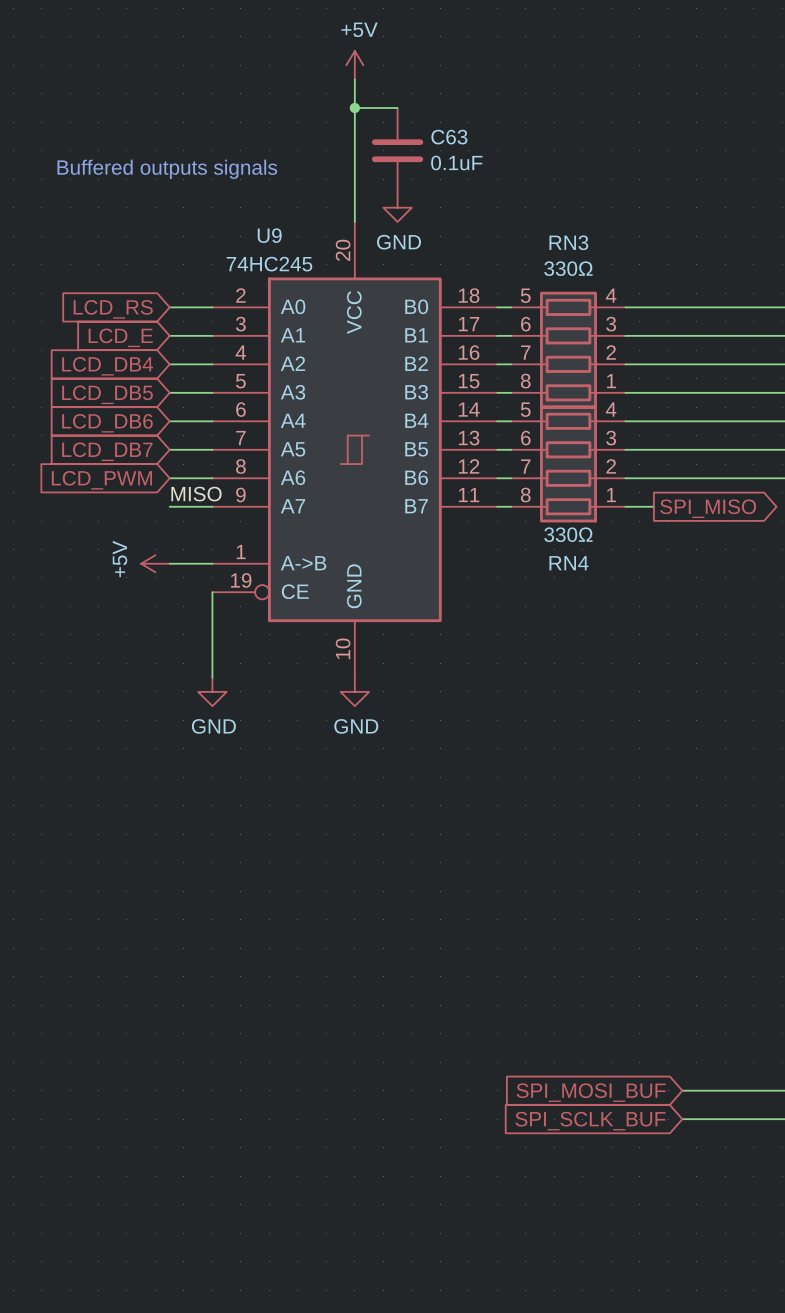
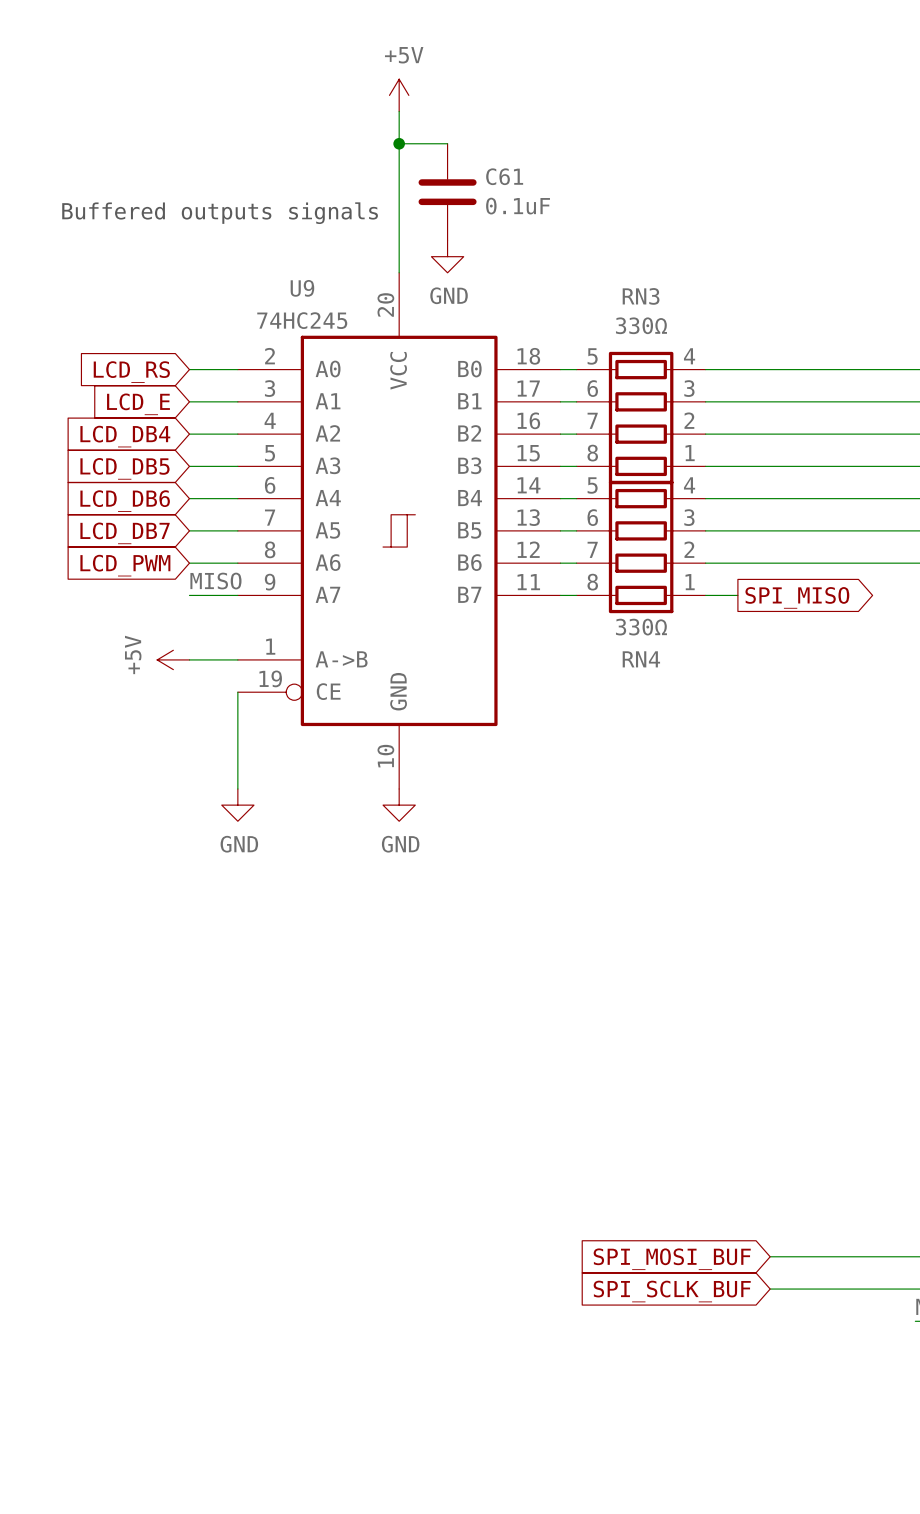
C63 name: C63 (449, 137) -> C61 (504, 176)

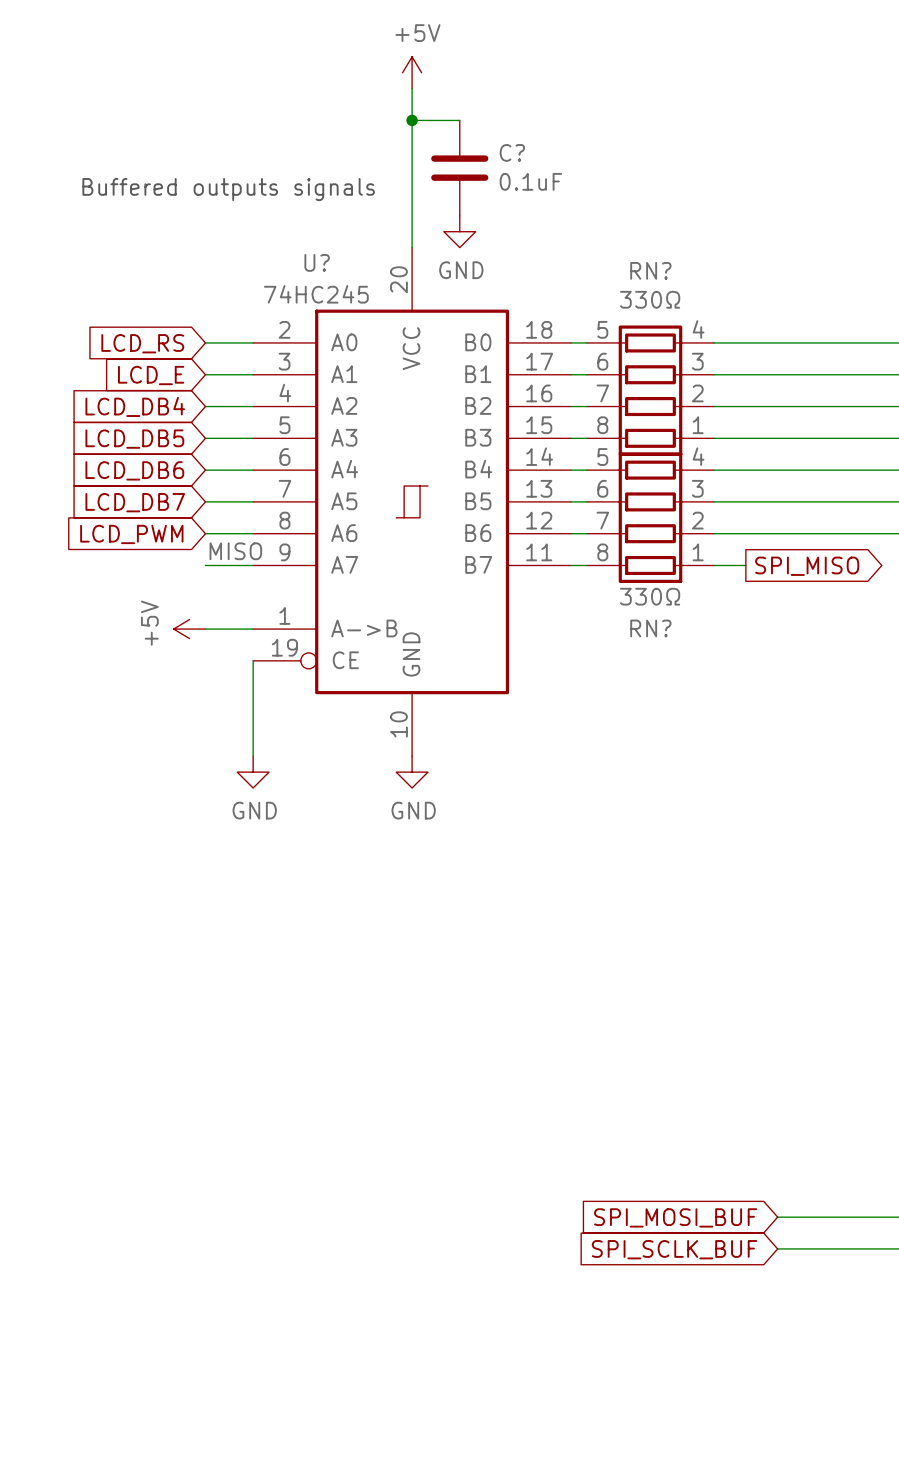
C61 name: C61 (504, 176) -> C? (512, 152)
U9 name: U9 (302, 288) -> U? (317, 262)
RN3 name: RN3 (641, 296) -> RN? (650, 270)
RN4 name: RN4 (641, 659) -> RN? (650, 628)

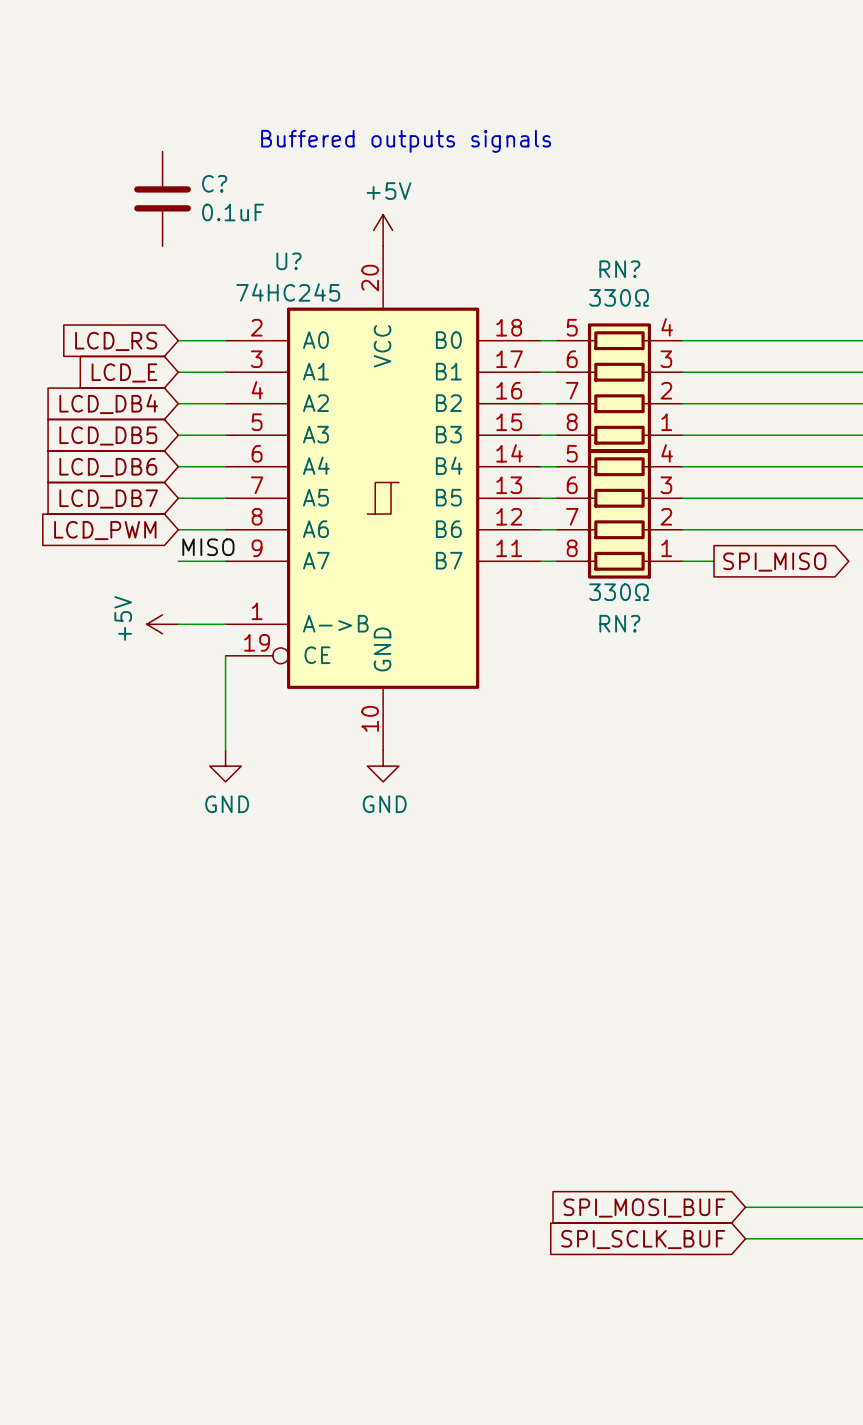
power symbol position: +5V (412, 72) -> +5V (383, 230)
wire: (412, 88) (412, 247) -> none
wire: (412, 120) (459, 120) -> none
junction: (412, 120) -> none
C? position: (459, 168) -> (162, 198)
text position: Buffered outputs signals (228, 189) -> Buffered outputs signals (406, 141)
power symbol: GND (459, 231) -> none

